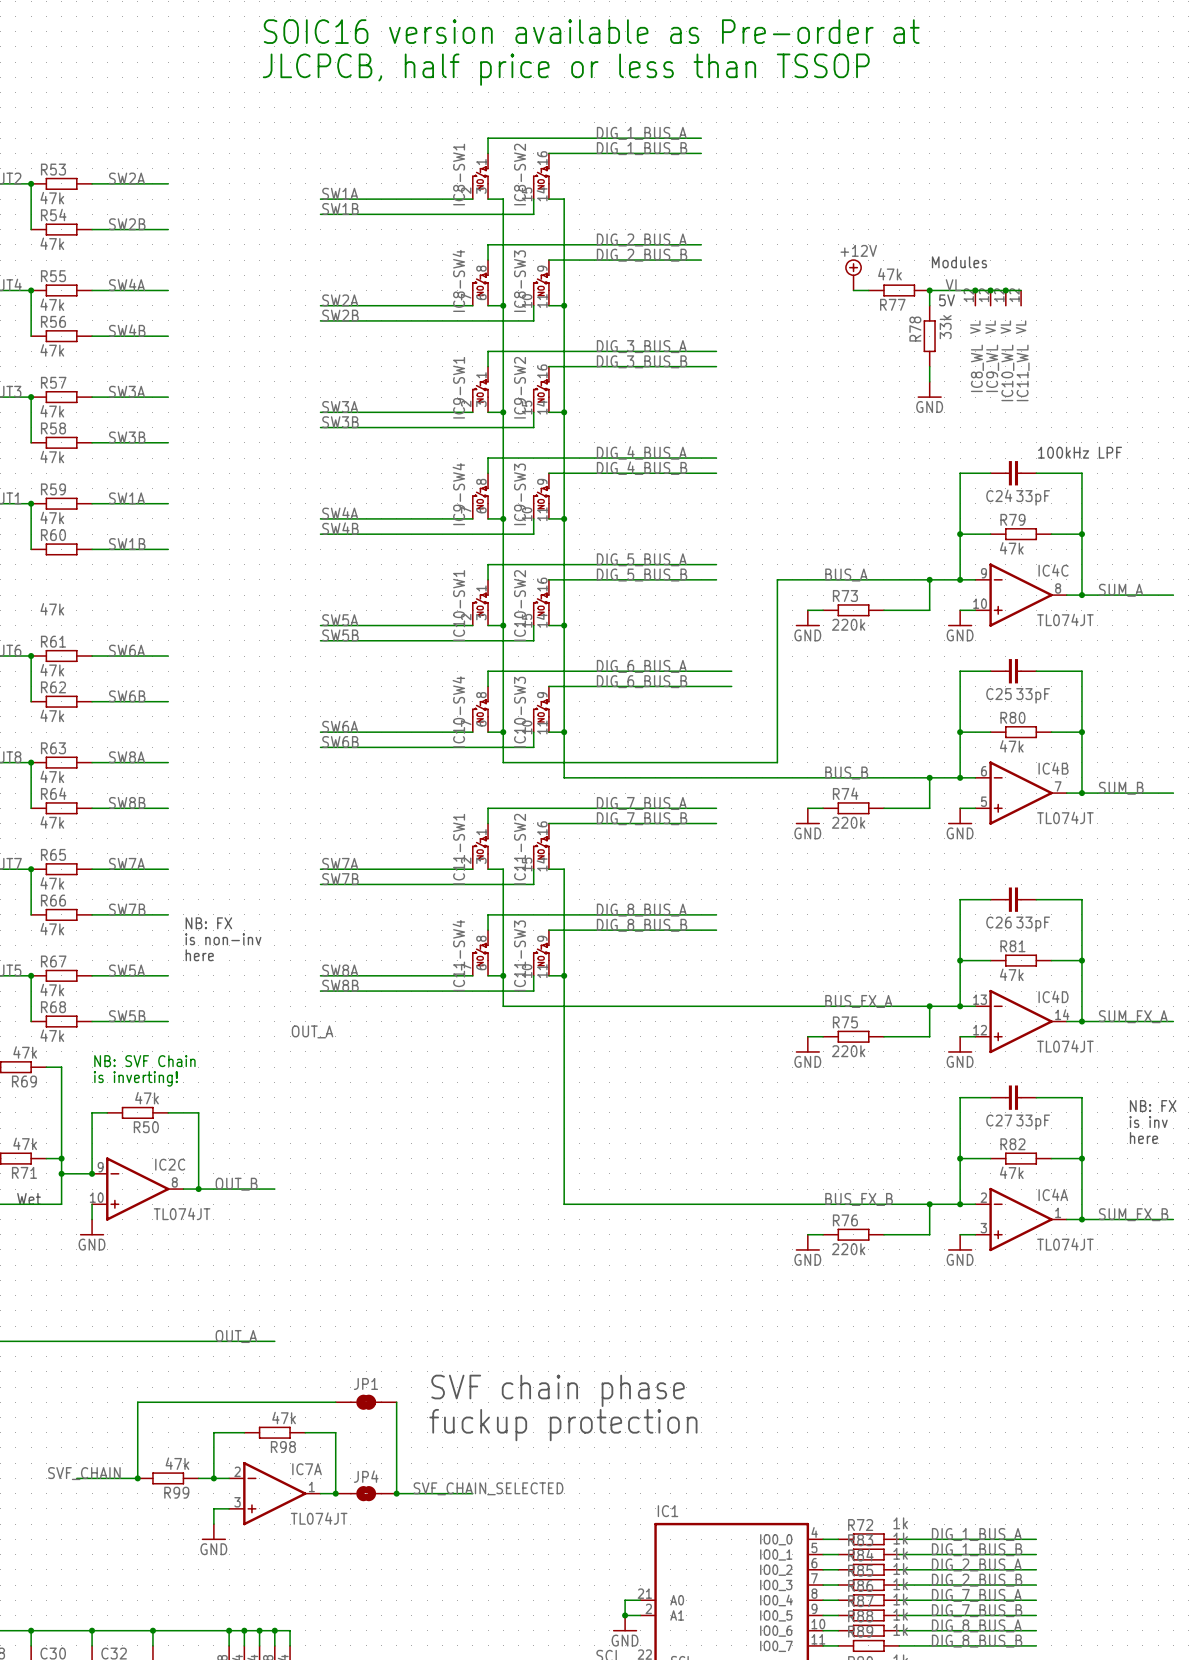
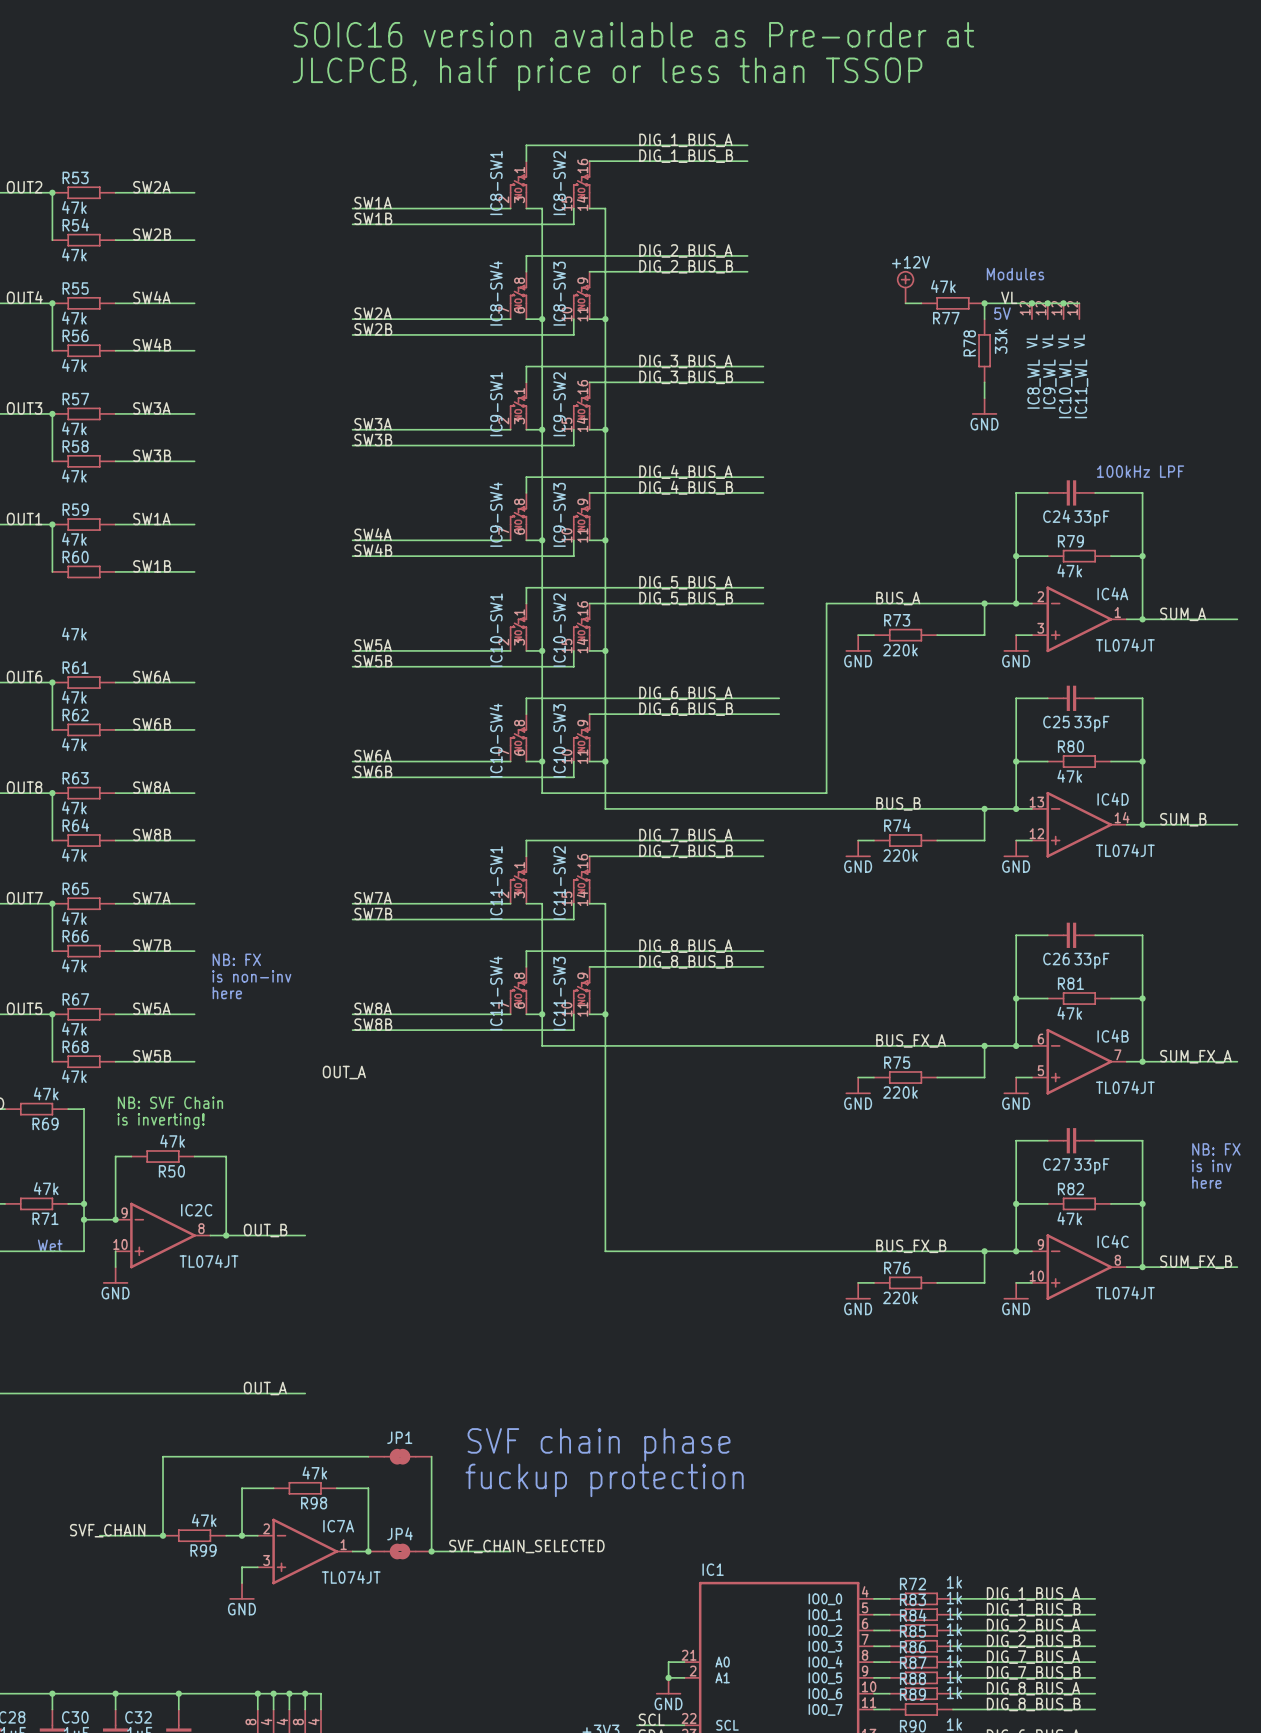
IC4C position: (1021, 595) -> (1079, 1267)
IC4B position: (1021, 793) -> (1079, 1061)
IC4D position: (1021, 1021) -> (1079, 824)
IC4A position: (1021, 1219) -> (1079, 619)

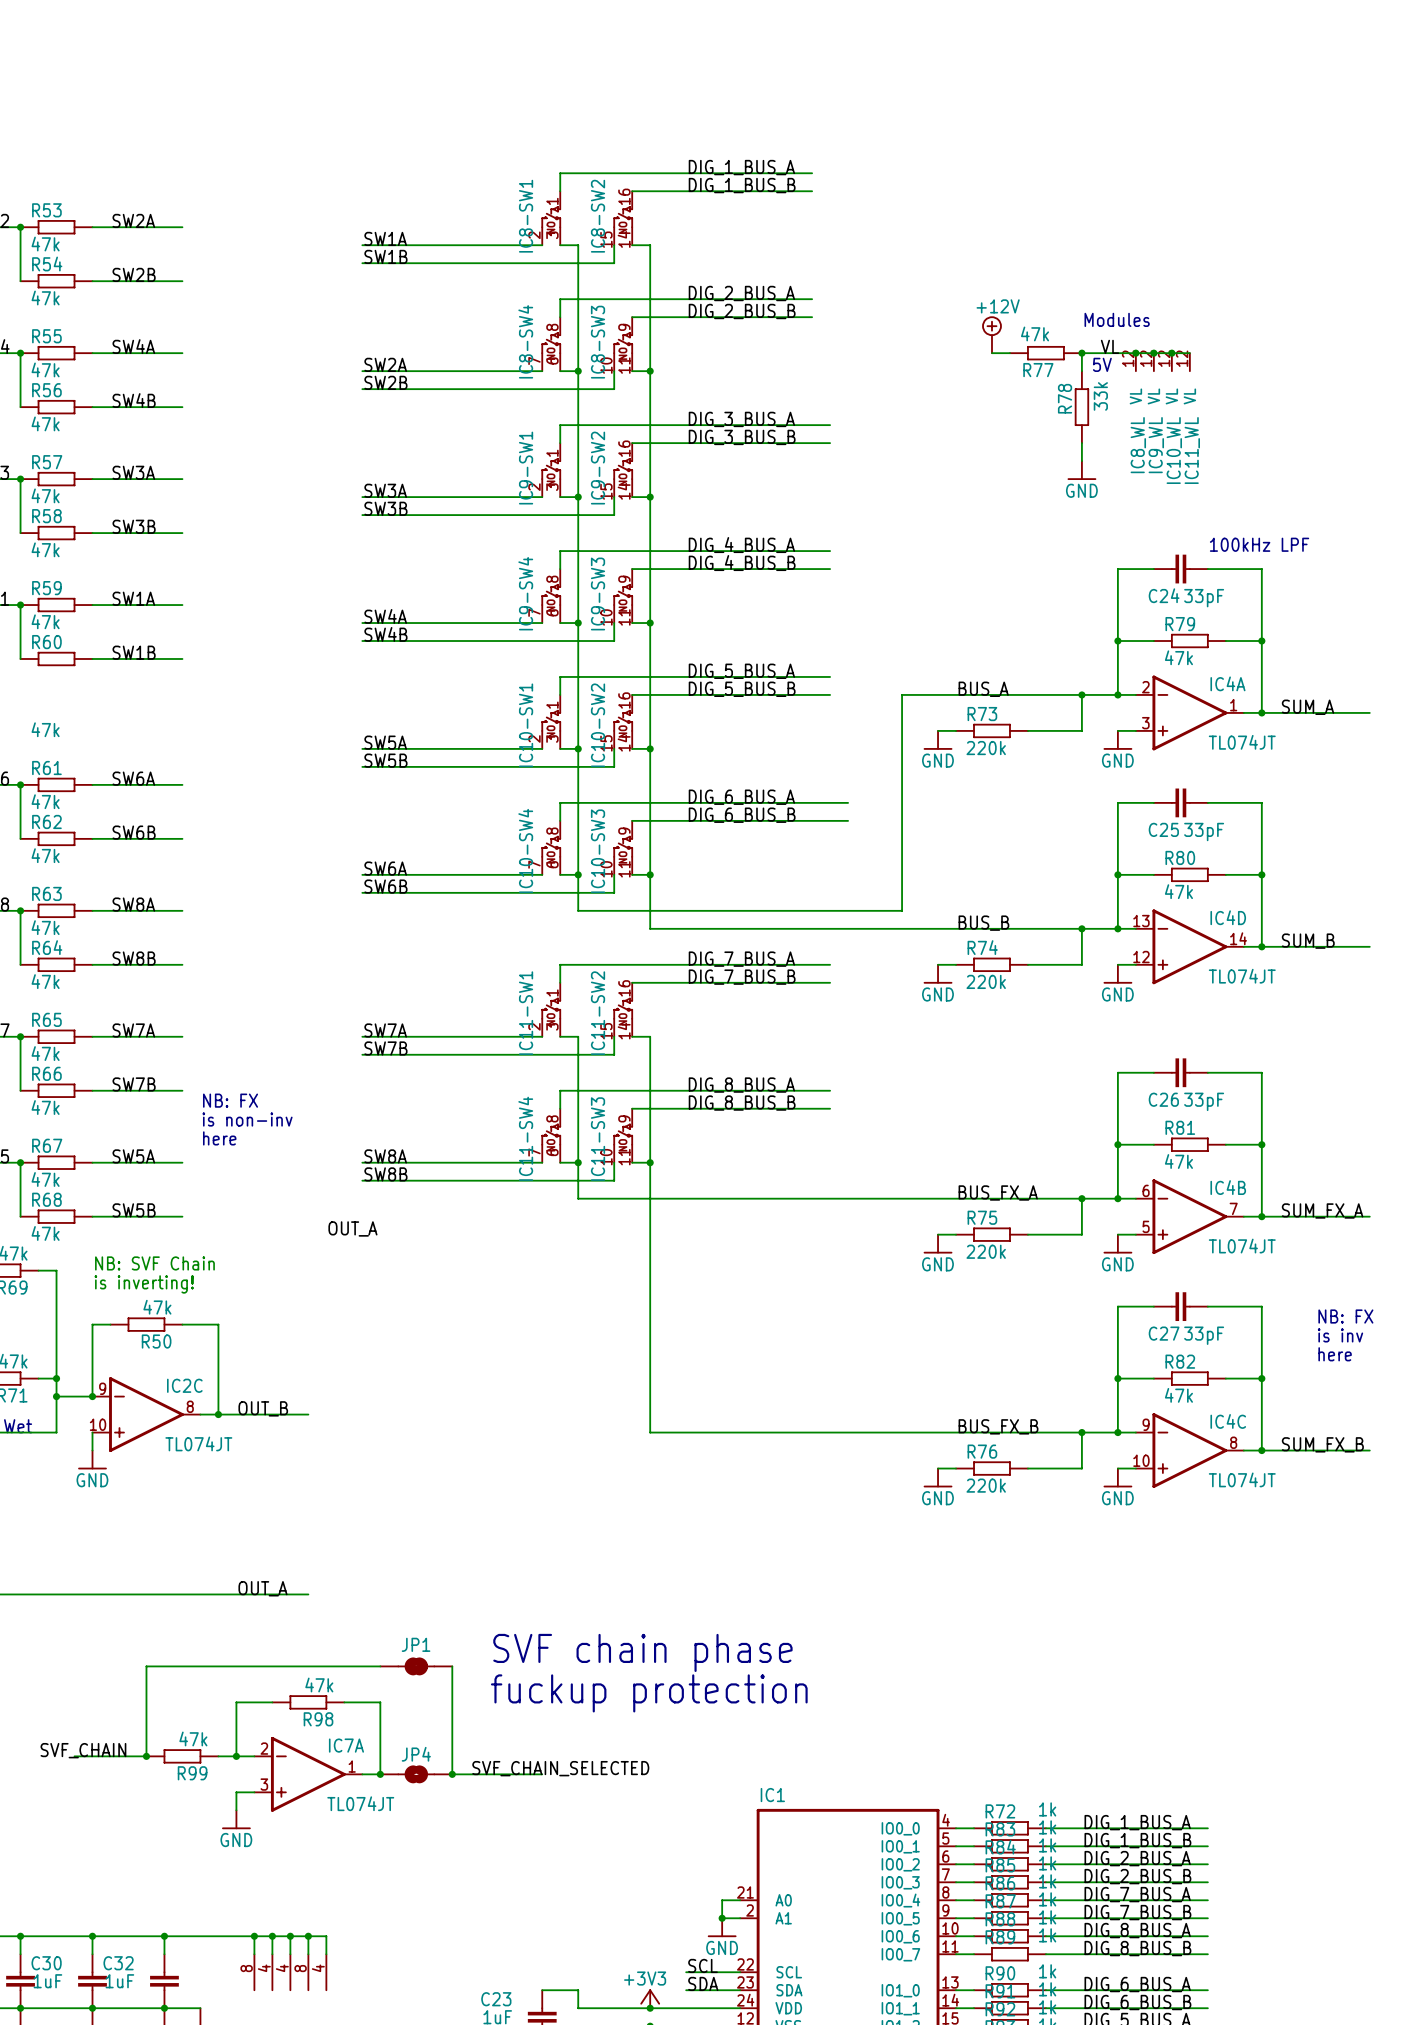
text: SOIC16 version available as Pre-order at (633, 34) -> none
text: JLCPCB, half price or less than TSSOP (607, 74) -> none

